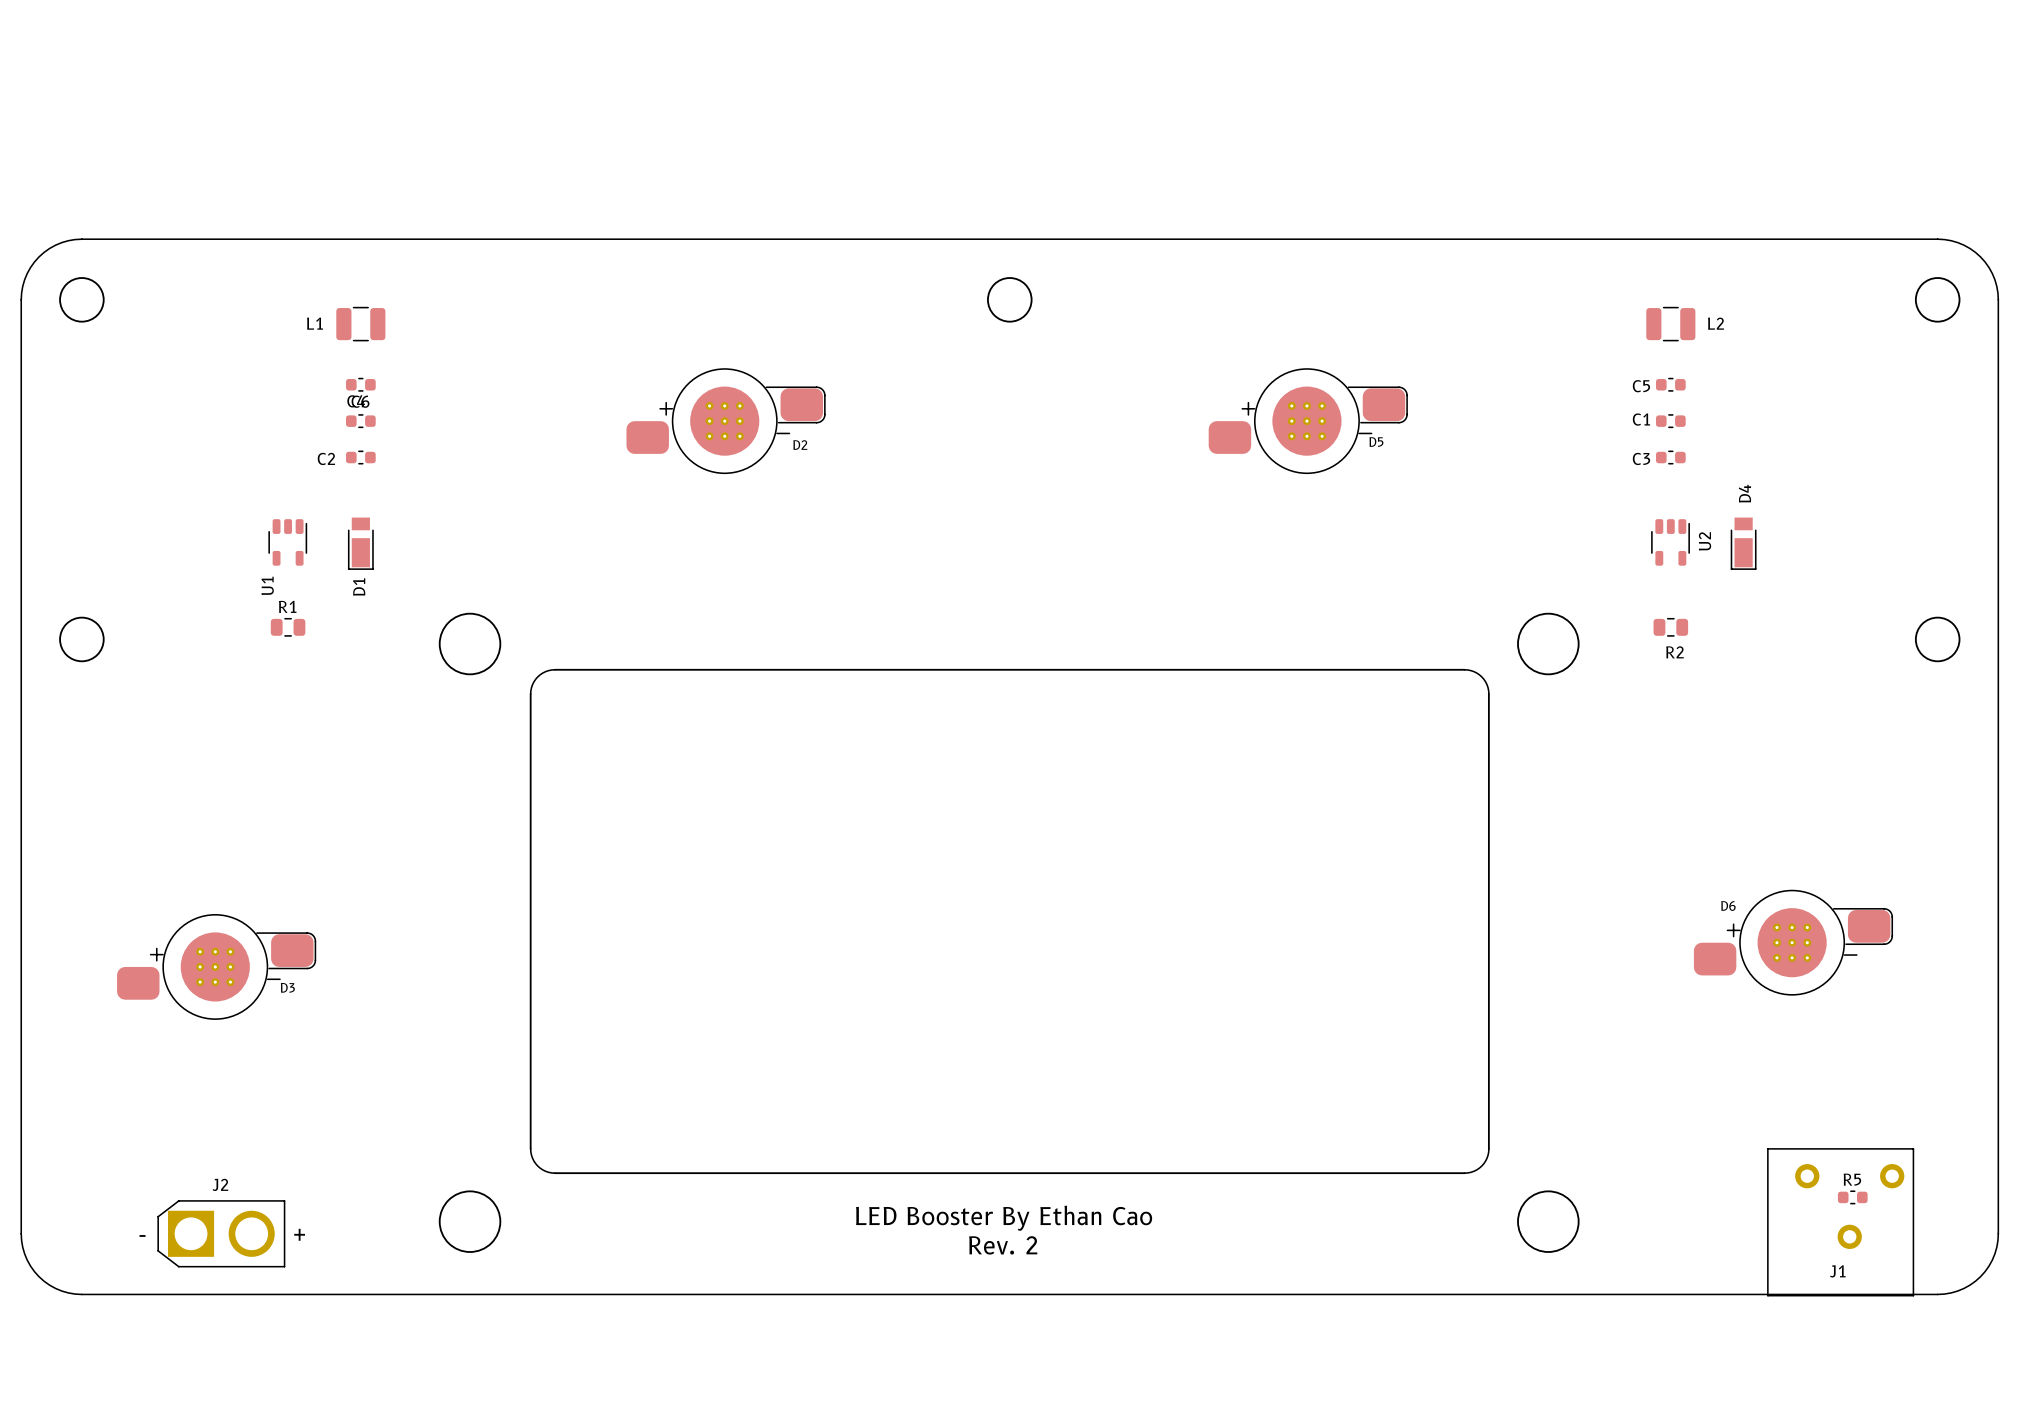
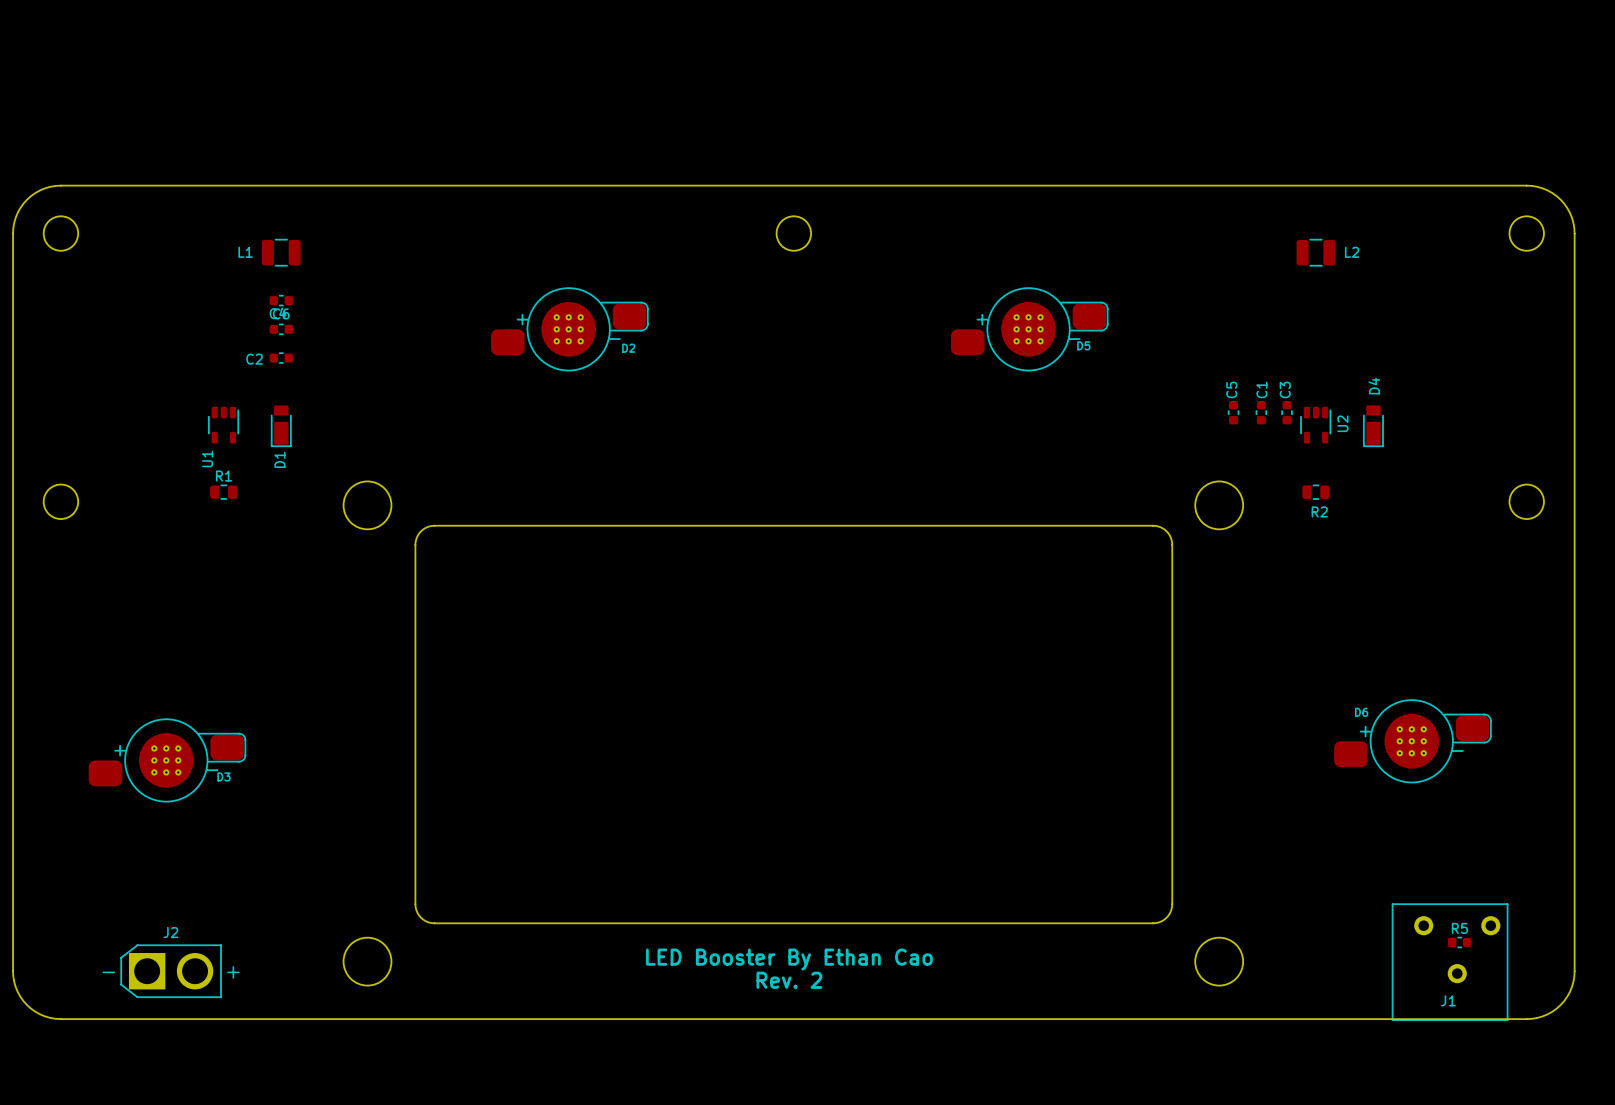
C5 rotation: 0° (1670, 384) -> 90° clockwise (1233, 412)
C5 position: (1670, 384) -> (1233, 412)
C1 rotation: 0° (1670, 421) -> 90° clockwise (1261, 412)
C1 position: (1670, 421) -> (1261, 412)
C3 rotation: 0° (1670, 457) -> 90° clockwise (1287, 412)
C3 position: (1670, 457) -> (1287, 412)

